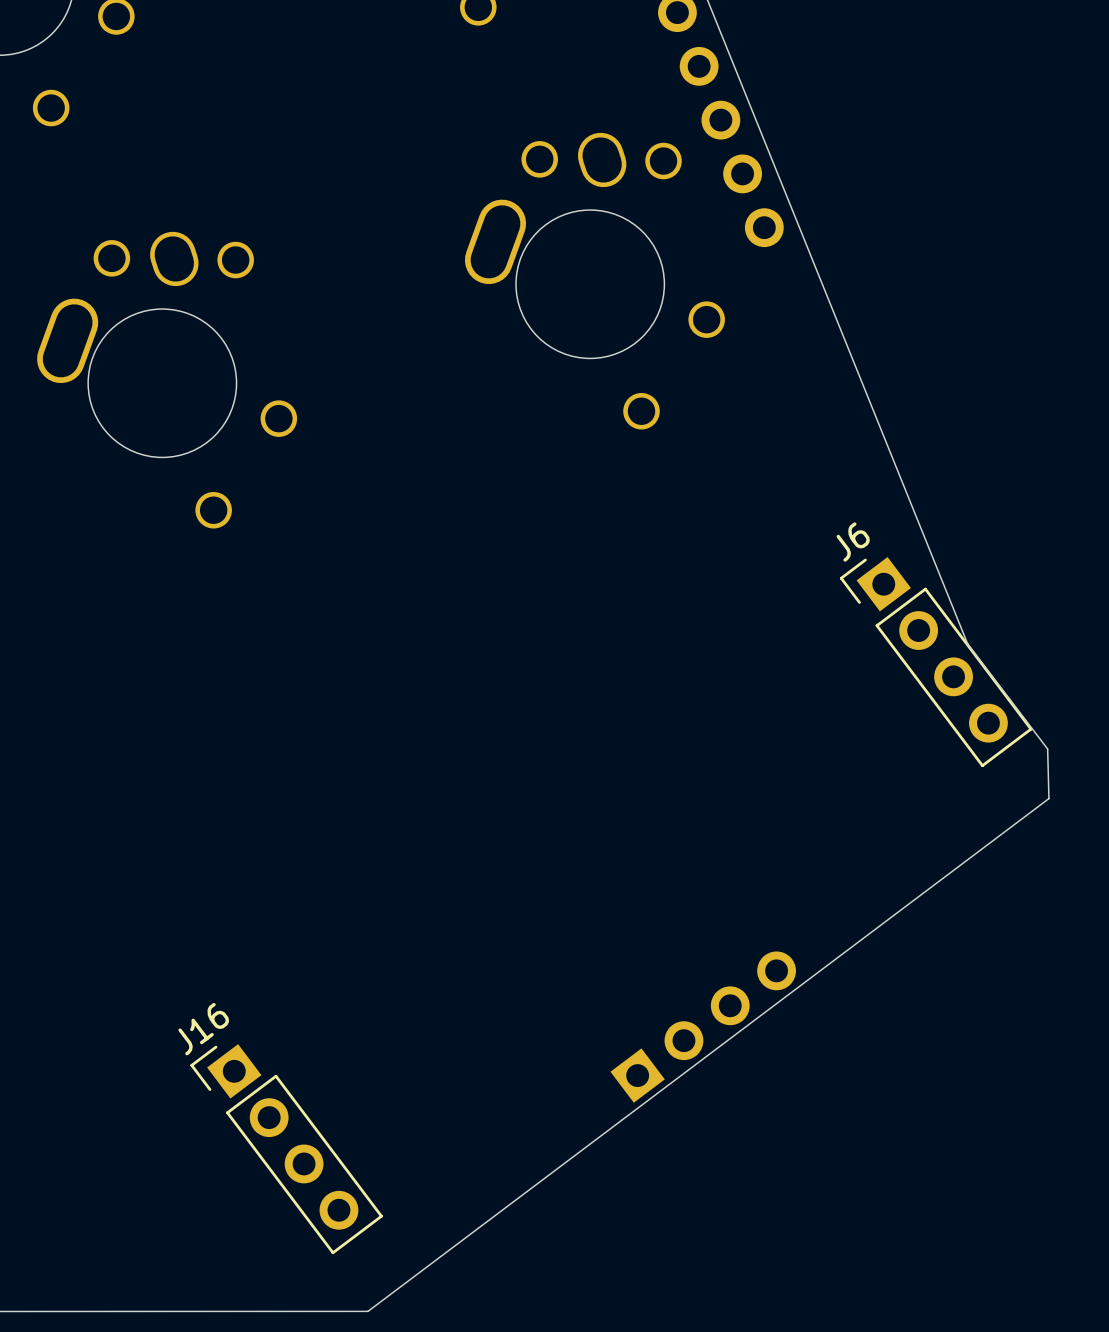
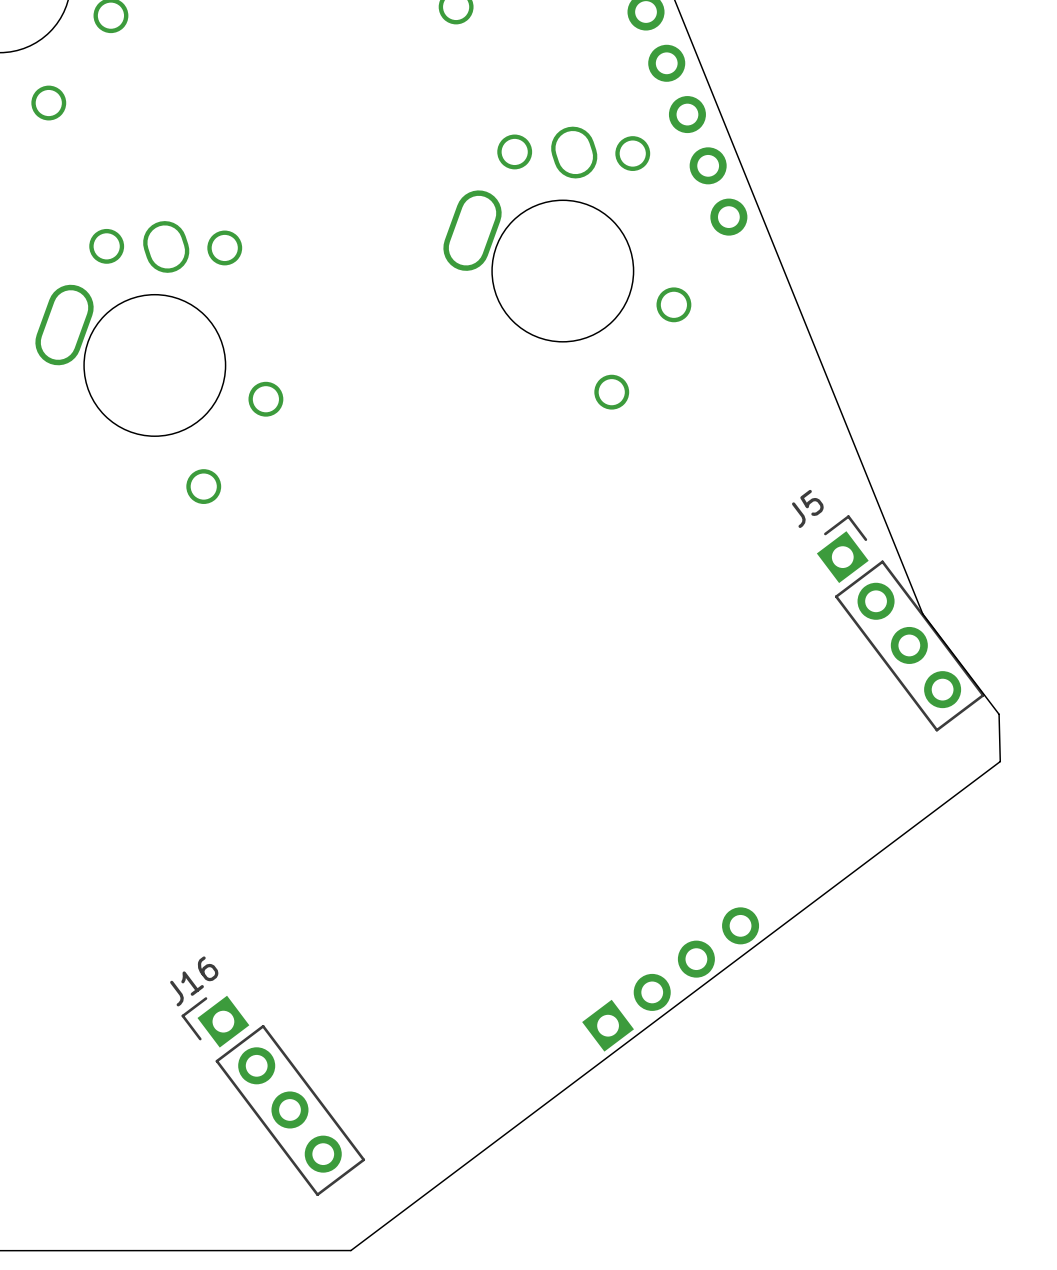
J5: none -> (900, 623)
J6: (936, 662) -> none

